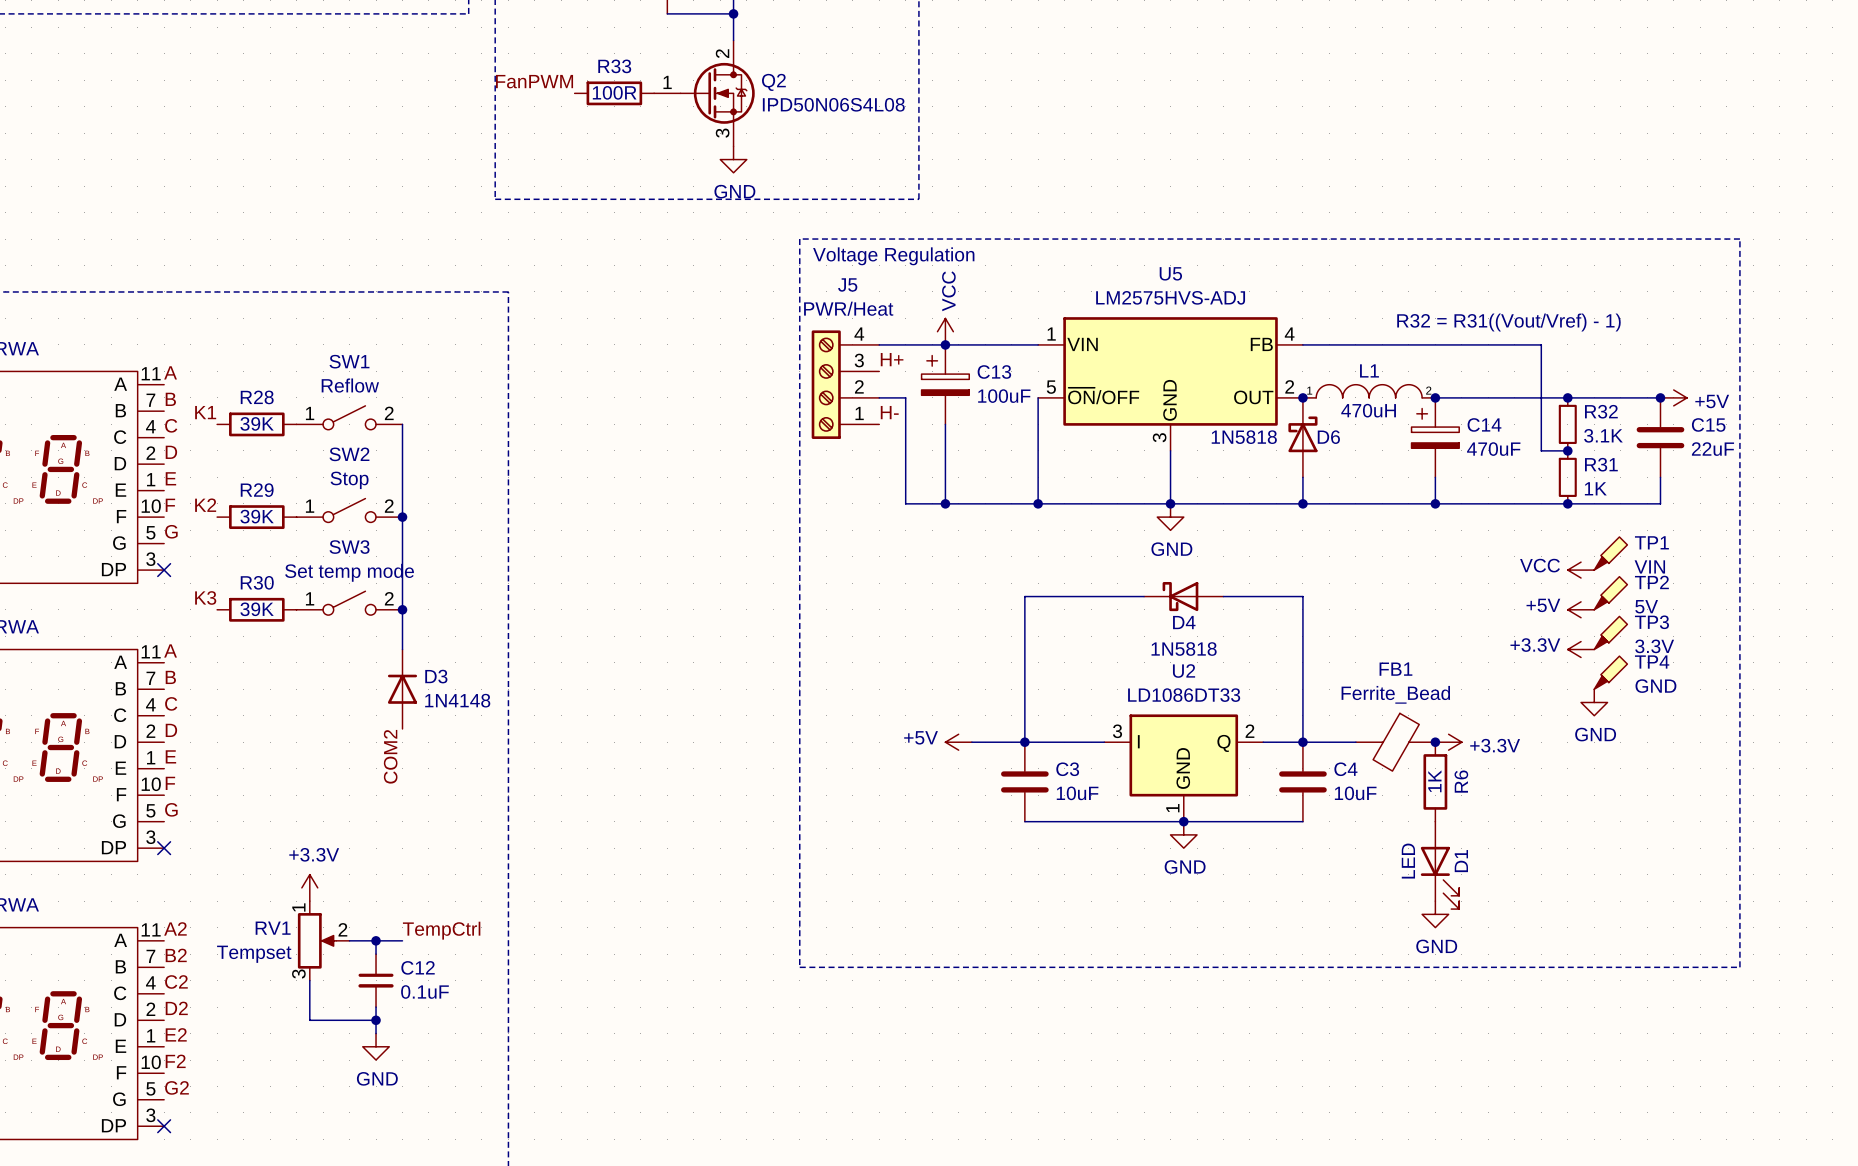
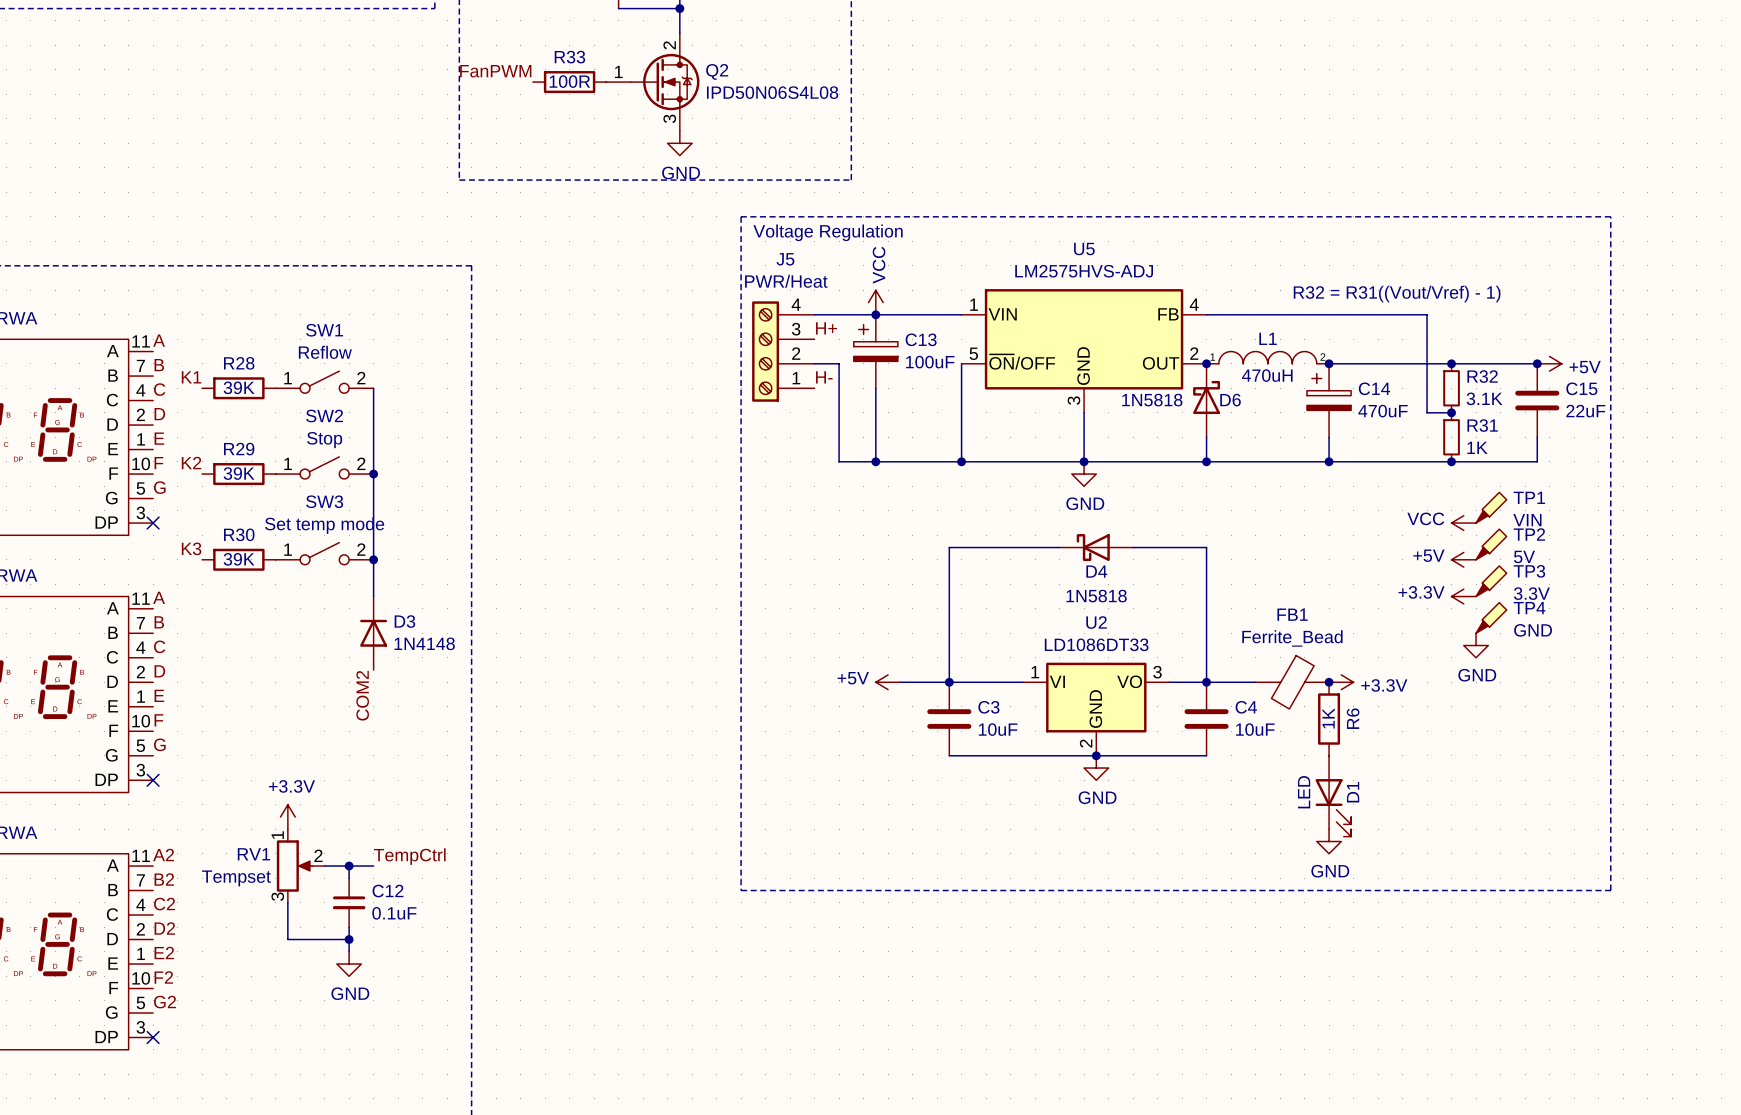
U2 symbol: [1104, 714, 1264, 822] -> [1022, 662, 1170, 756]

